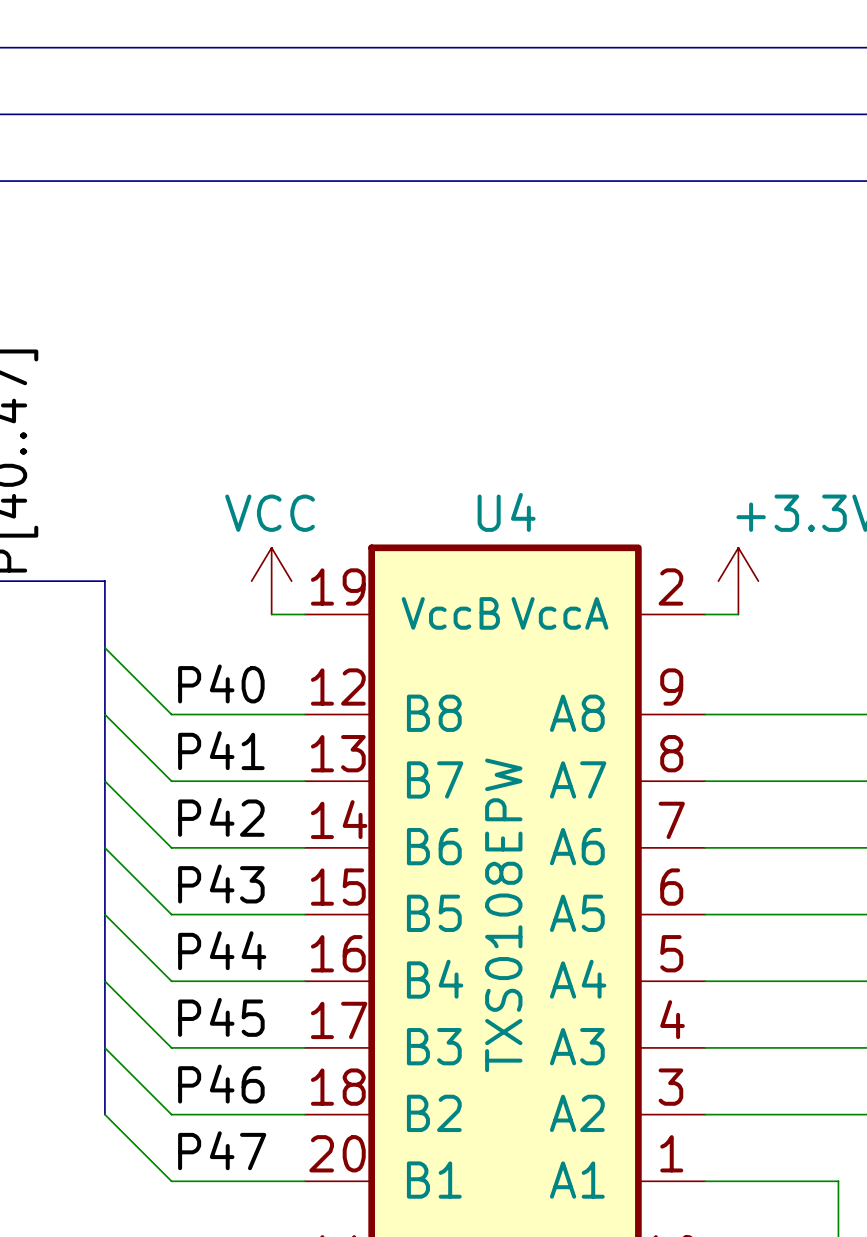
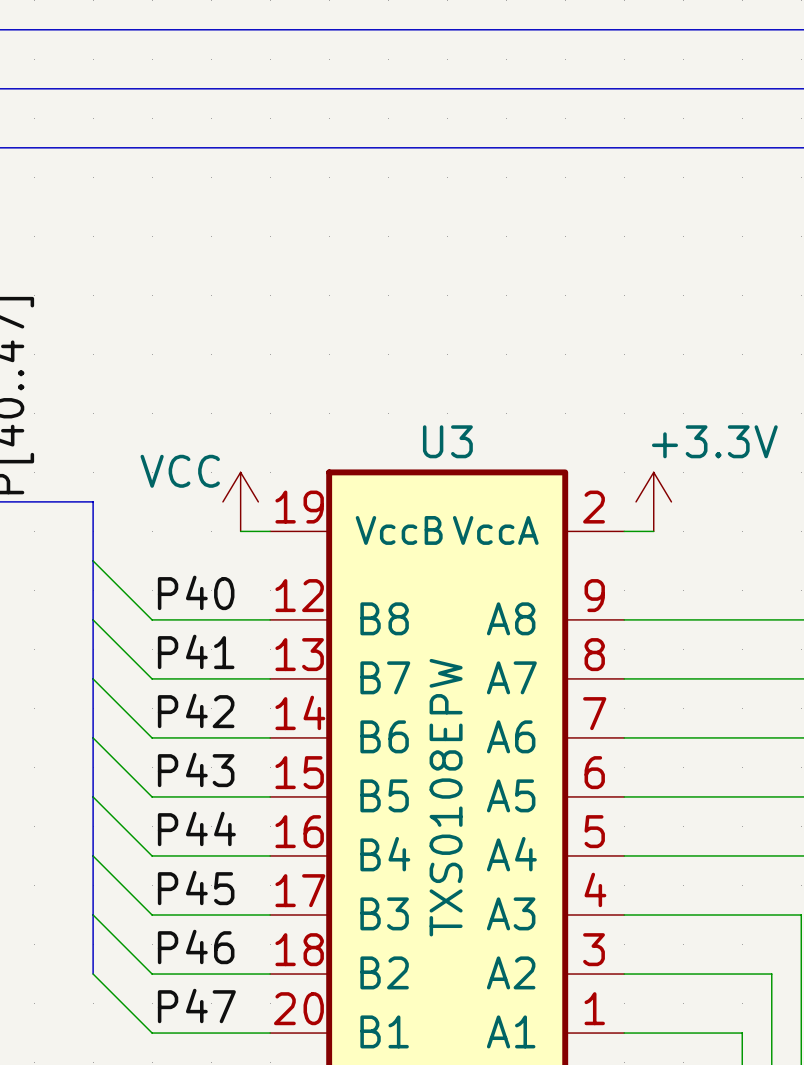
U4 name: U4 (506, 512) -> U3 (447, 441)
power symbol text position: VCC (270, 513) -> VCC (180, 471)

